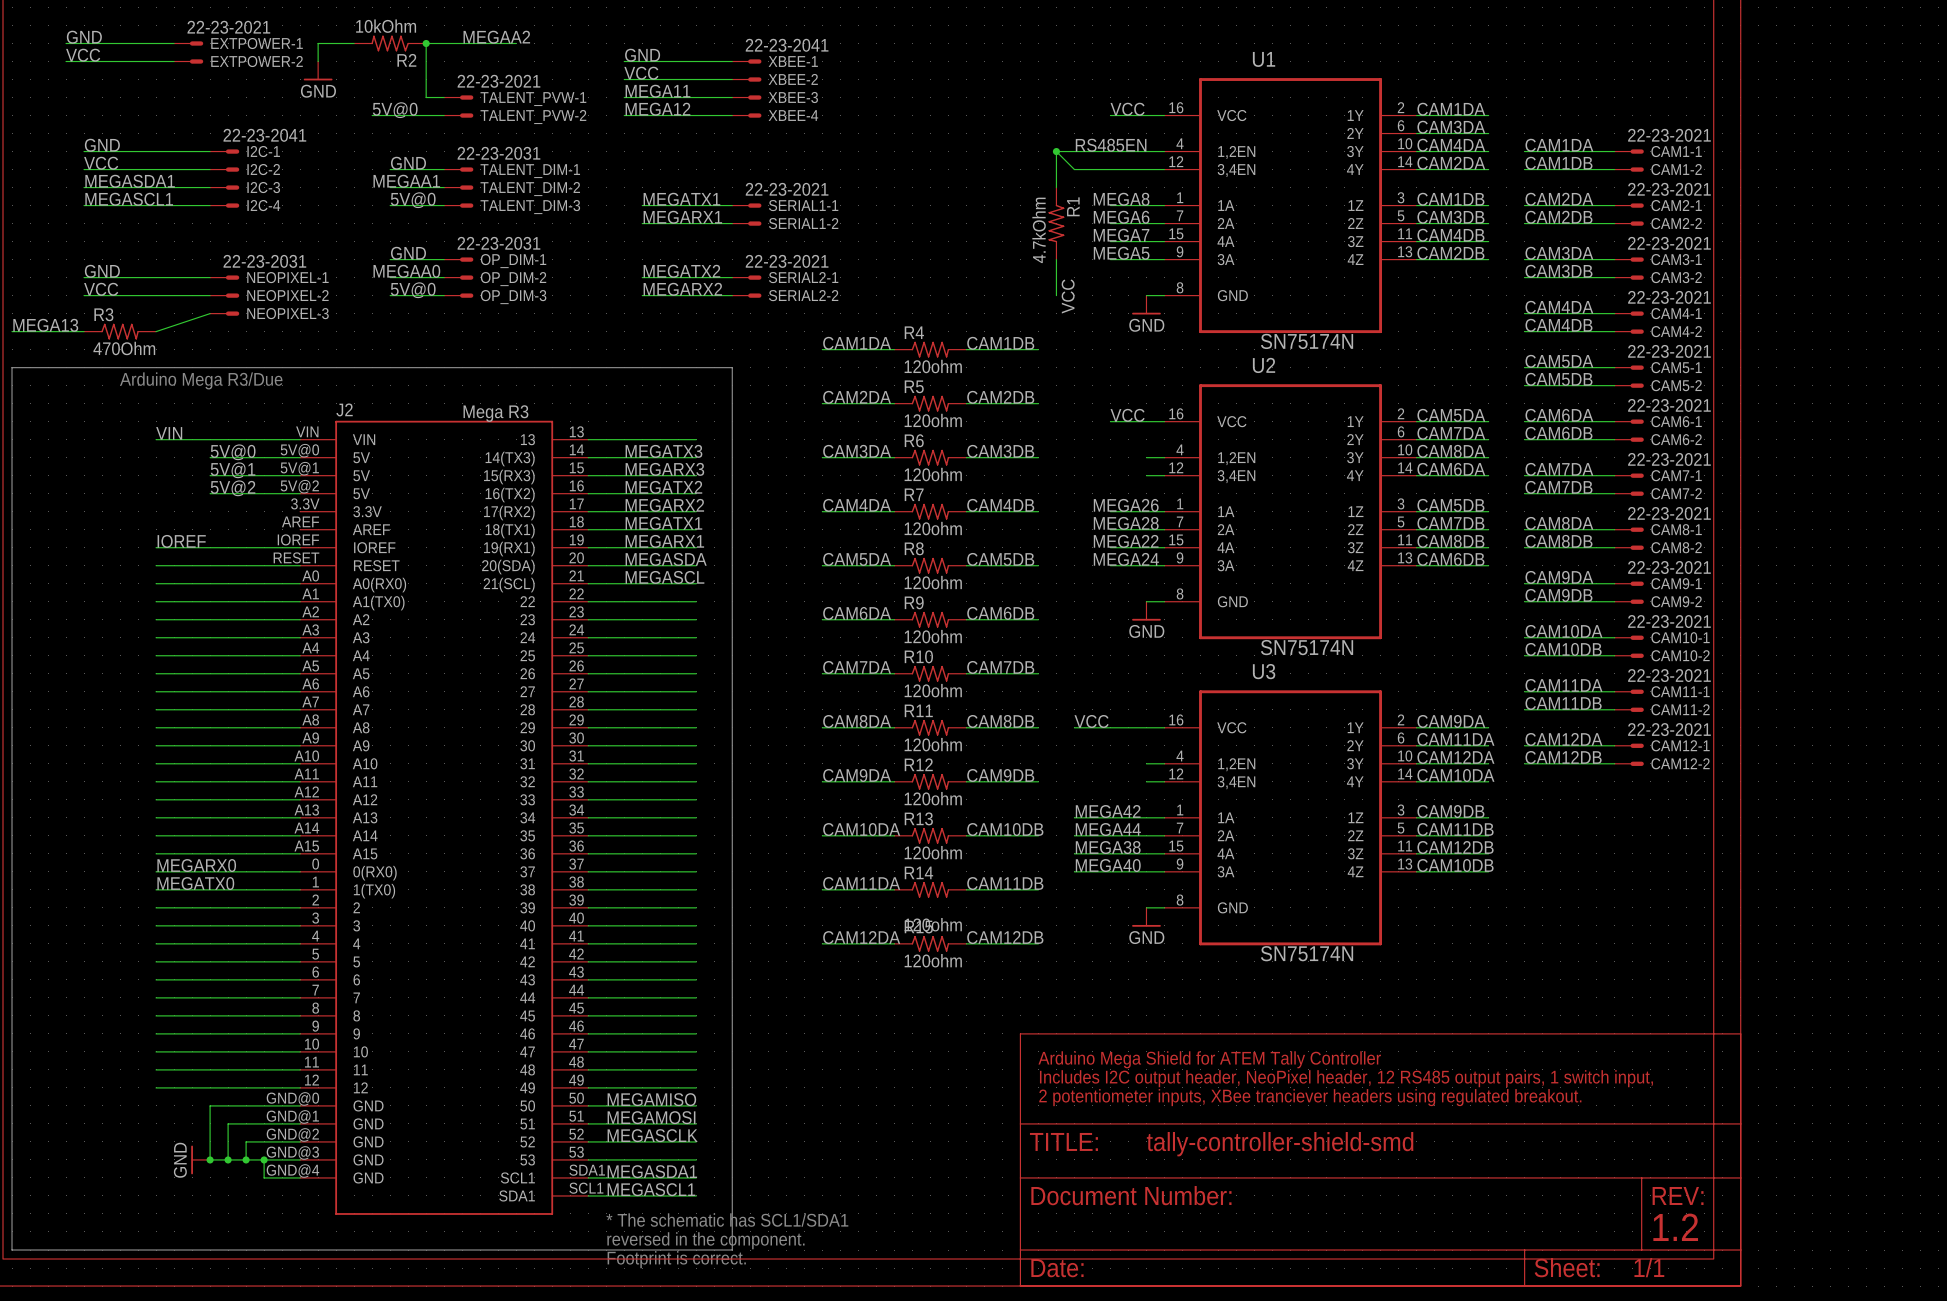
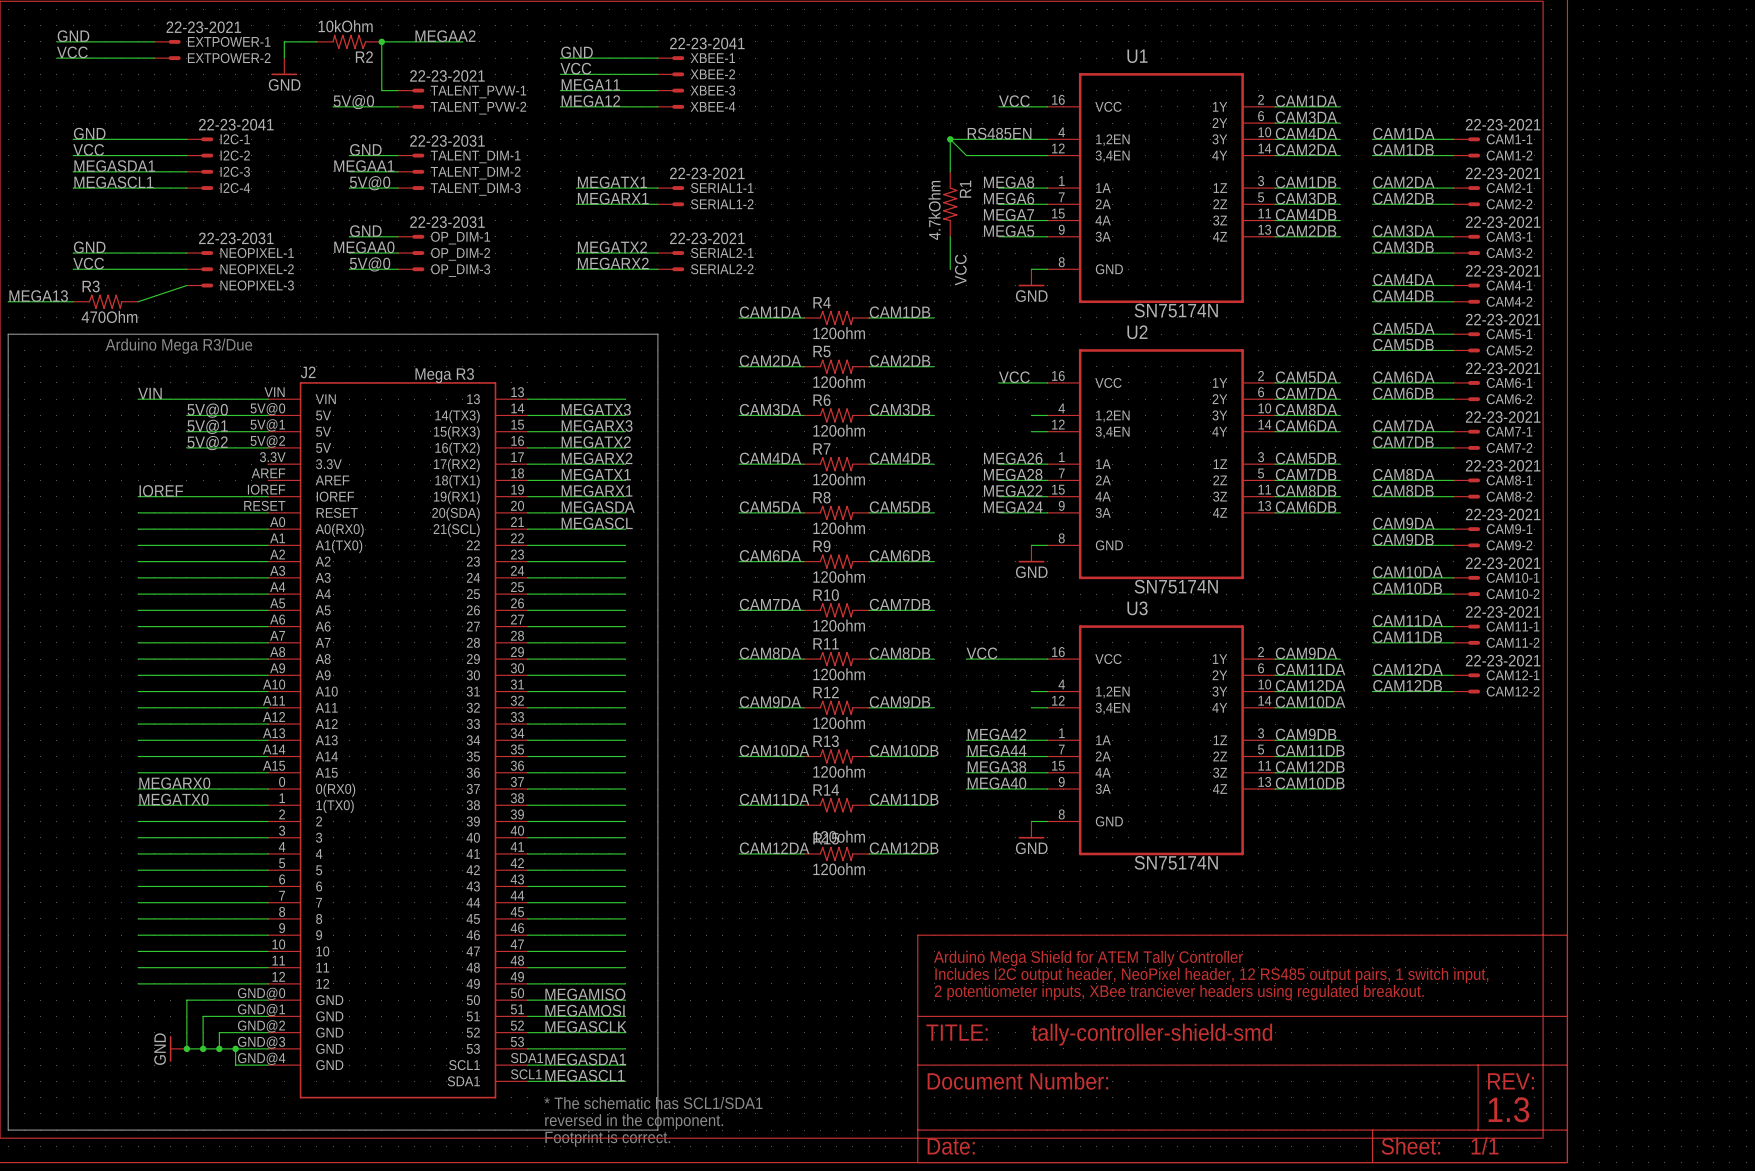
text: 1.2 (1675, 1227) -> 1.3 (1508, 1109)

